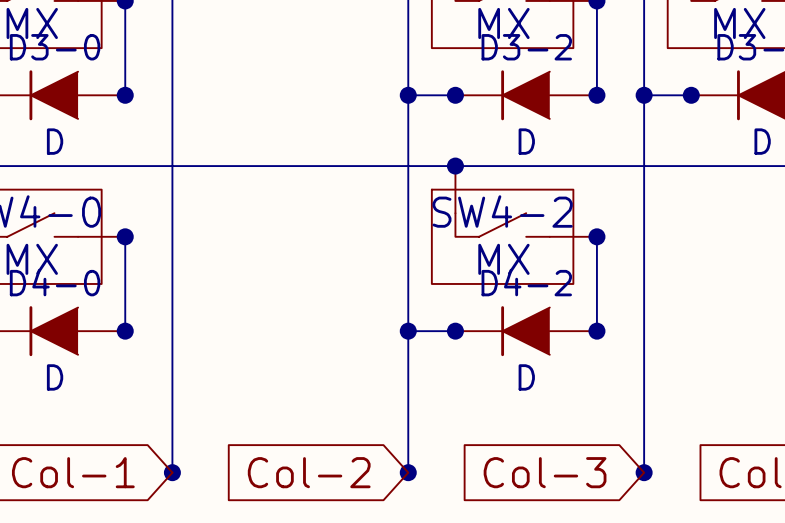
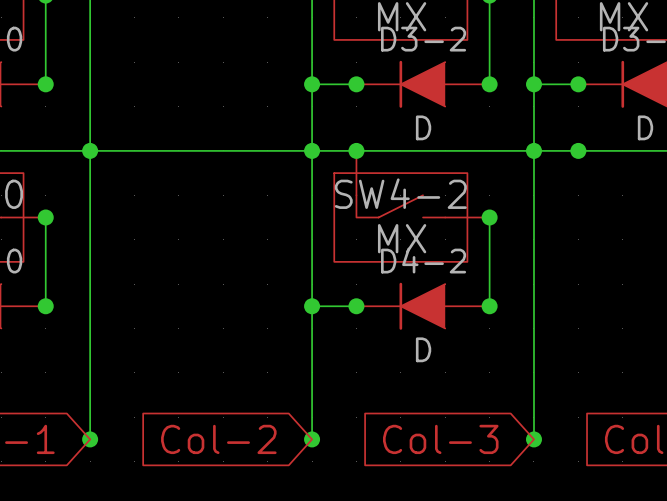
junction: none -> (90, 150)
junction: none -> (312, 150)
junction: none -> (533, 150)
junction: none -> (578, 150)

